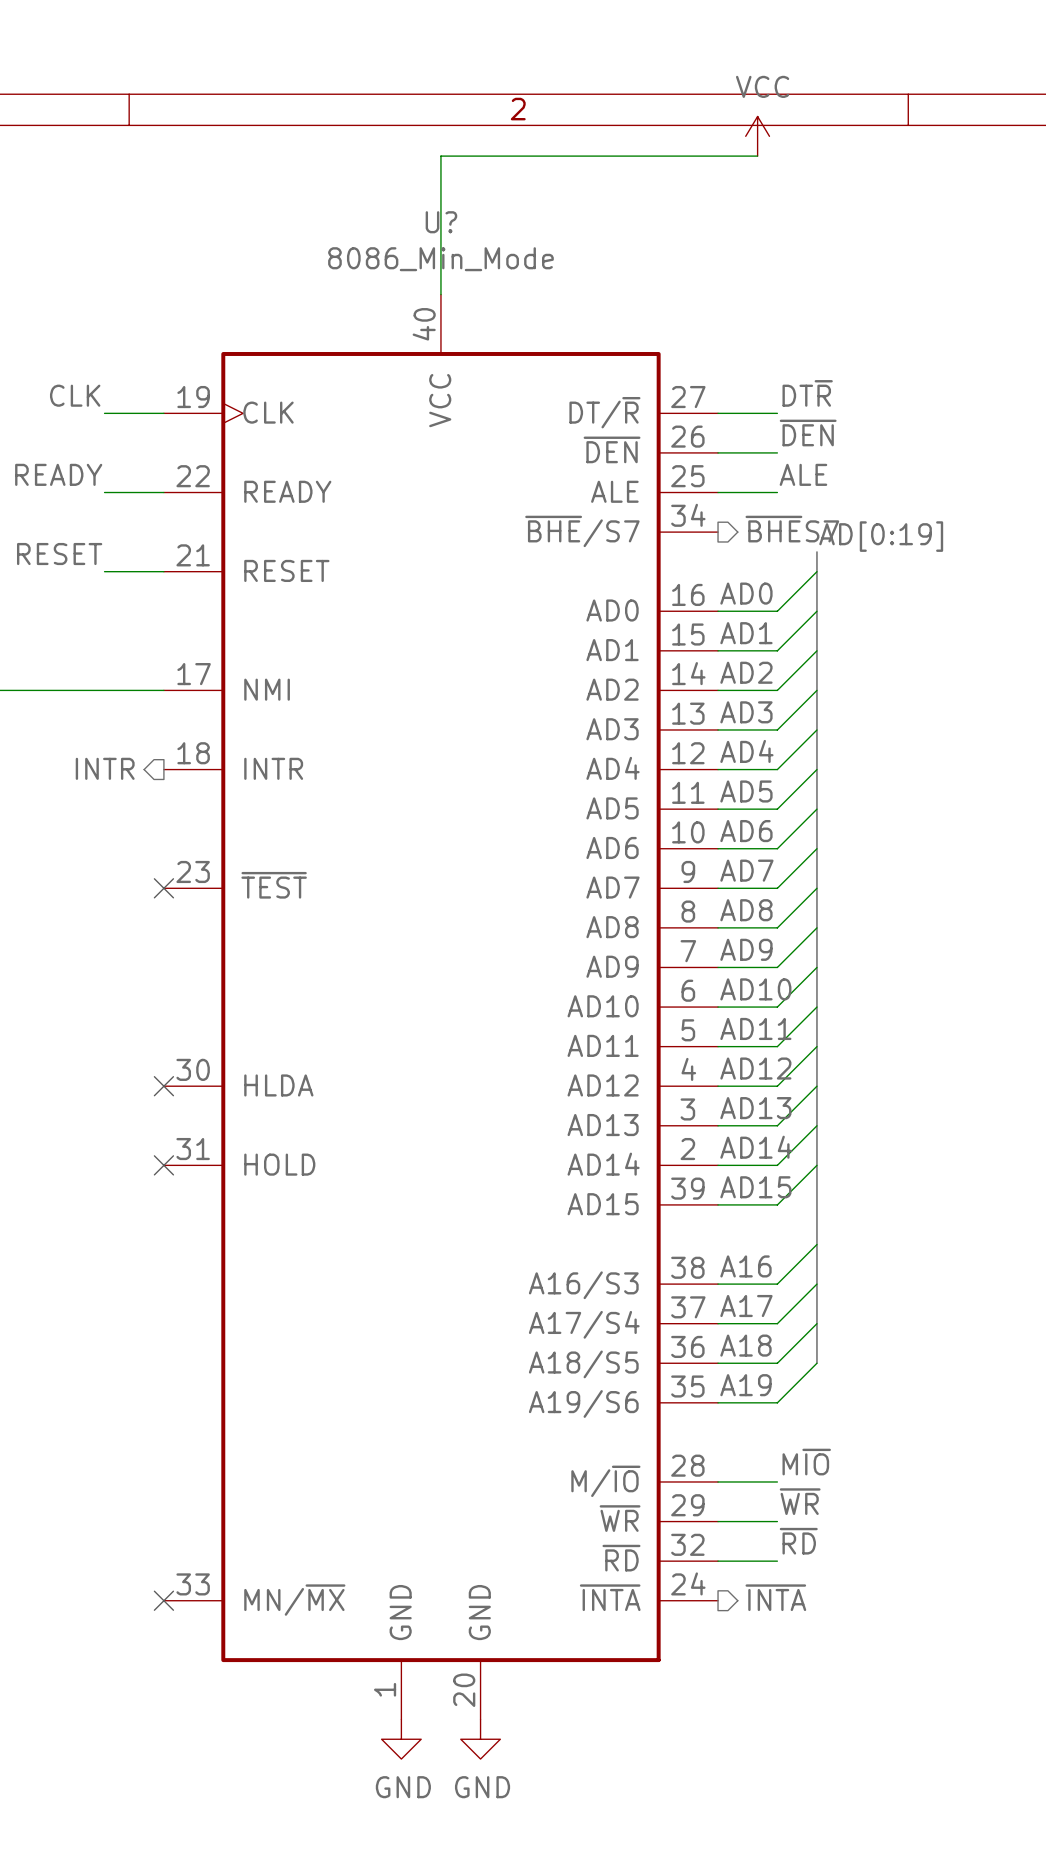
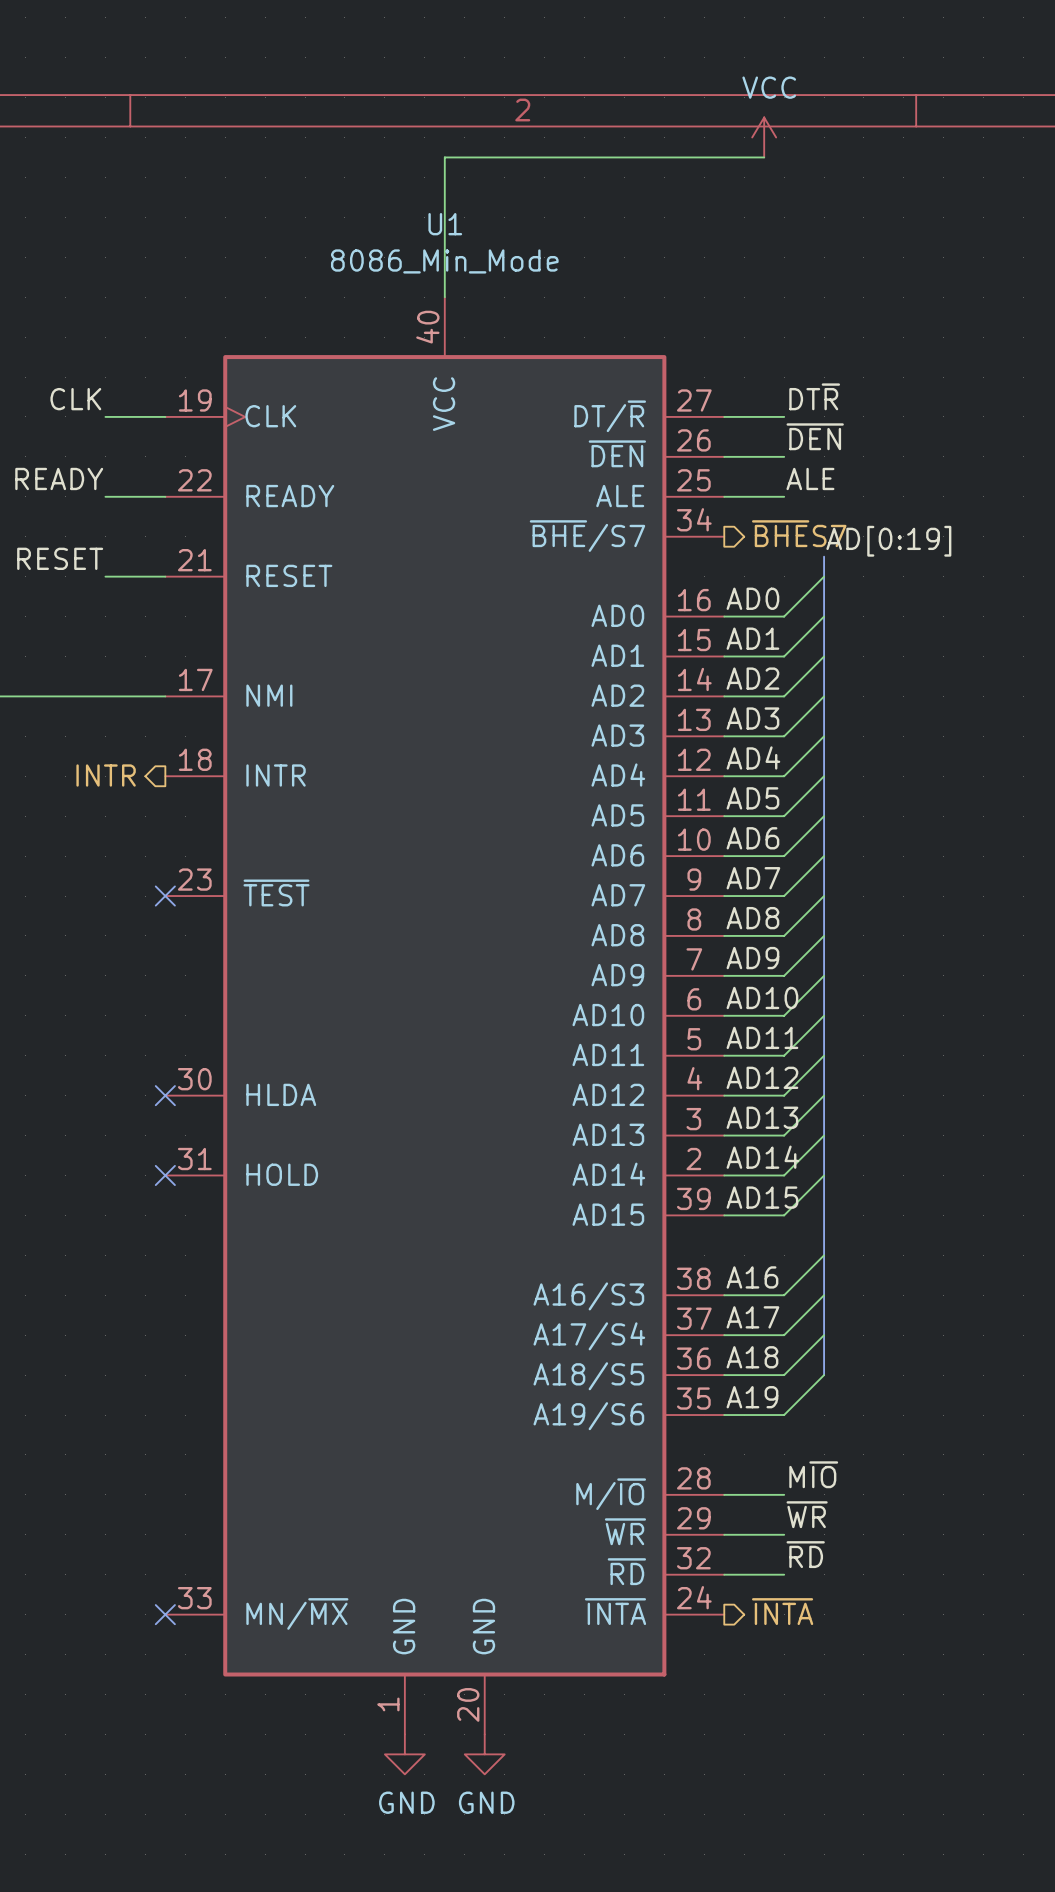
U? name: U? (441, 222) -> U1 (445, 224)

